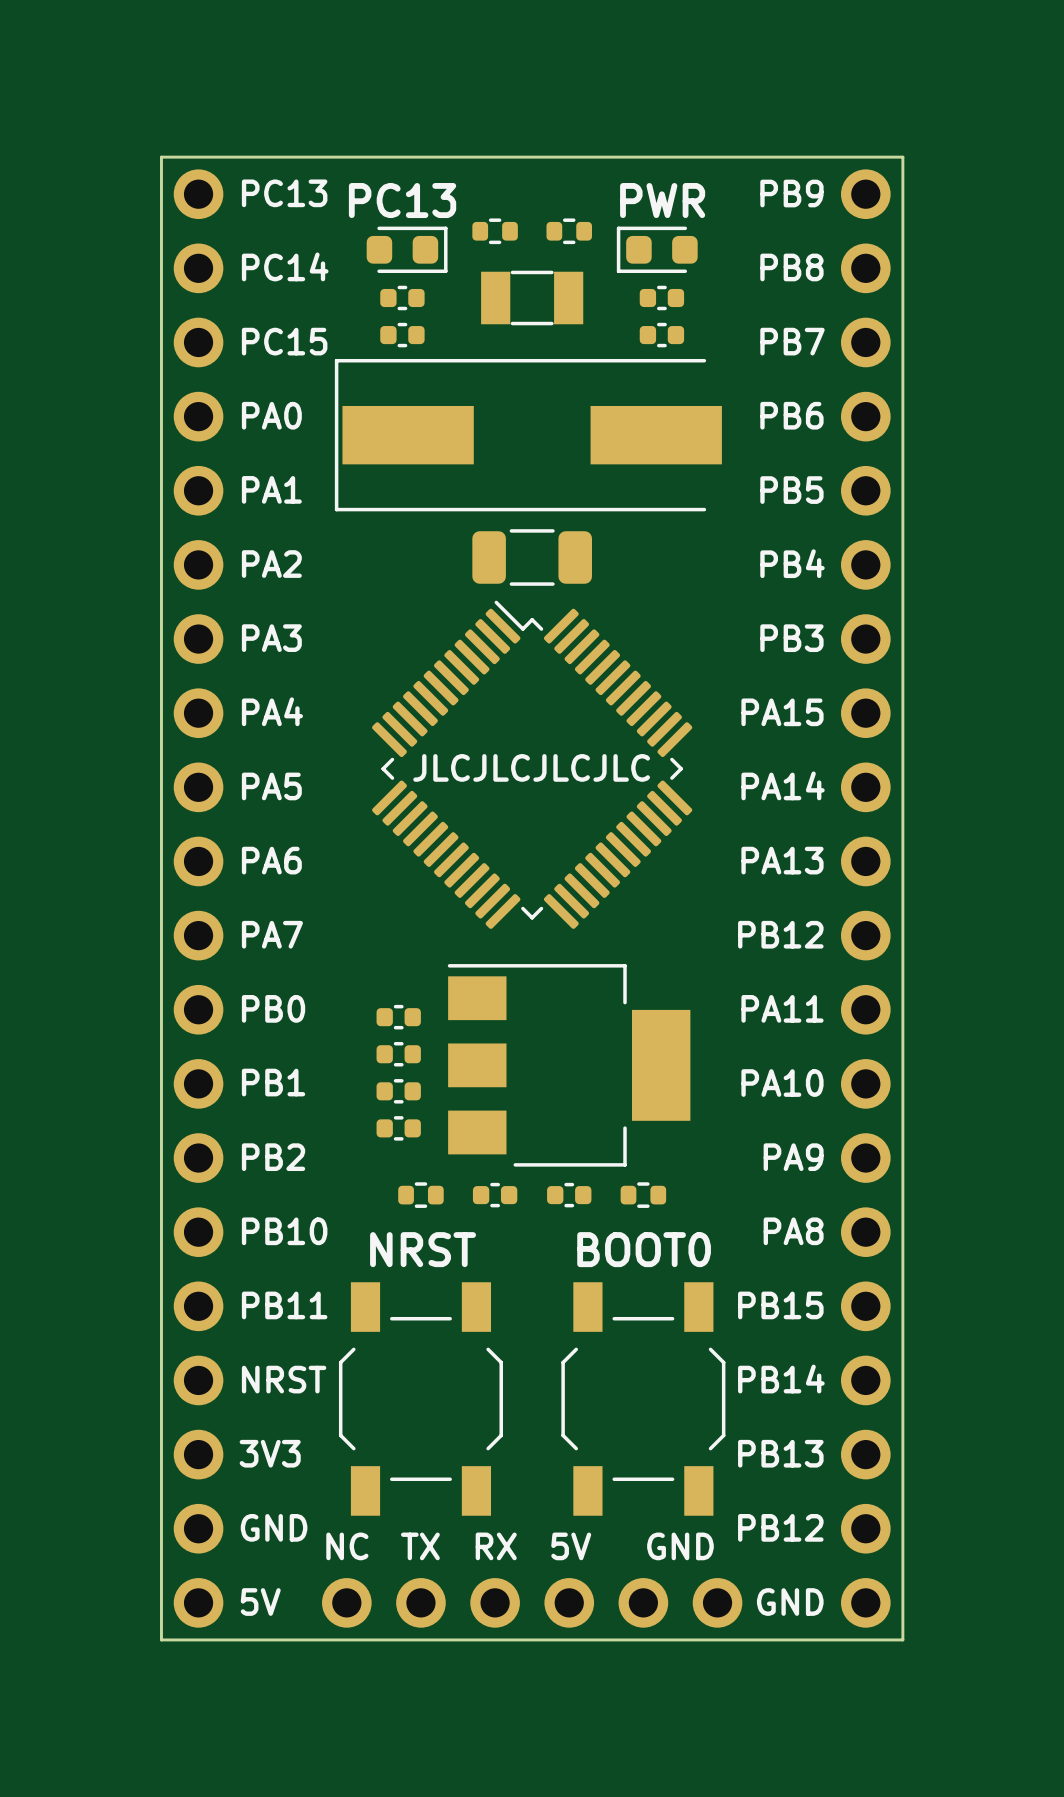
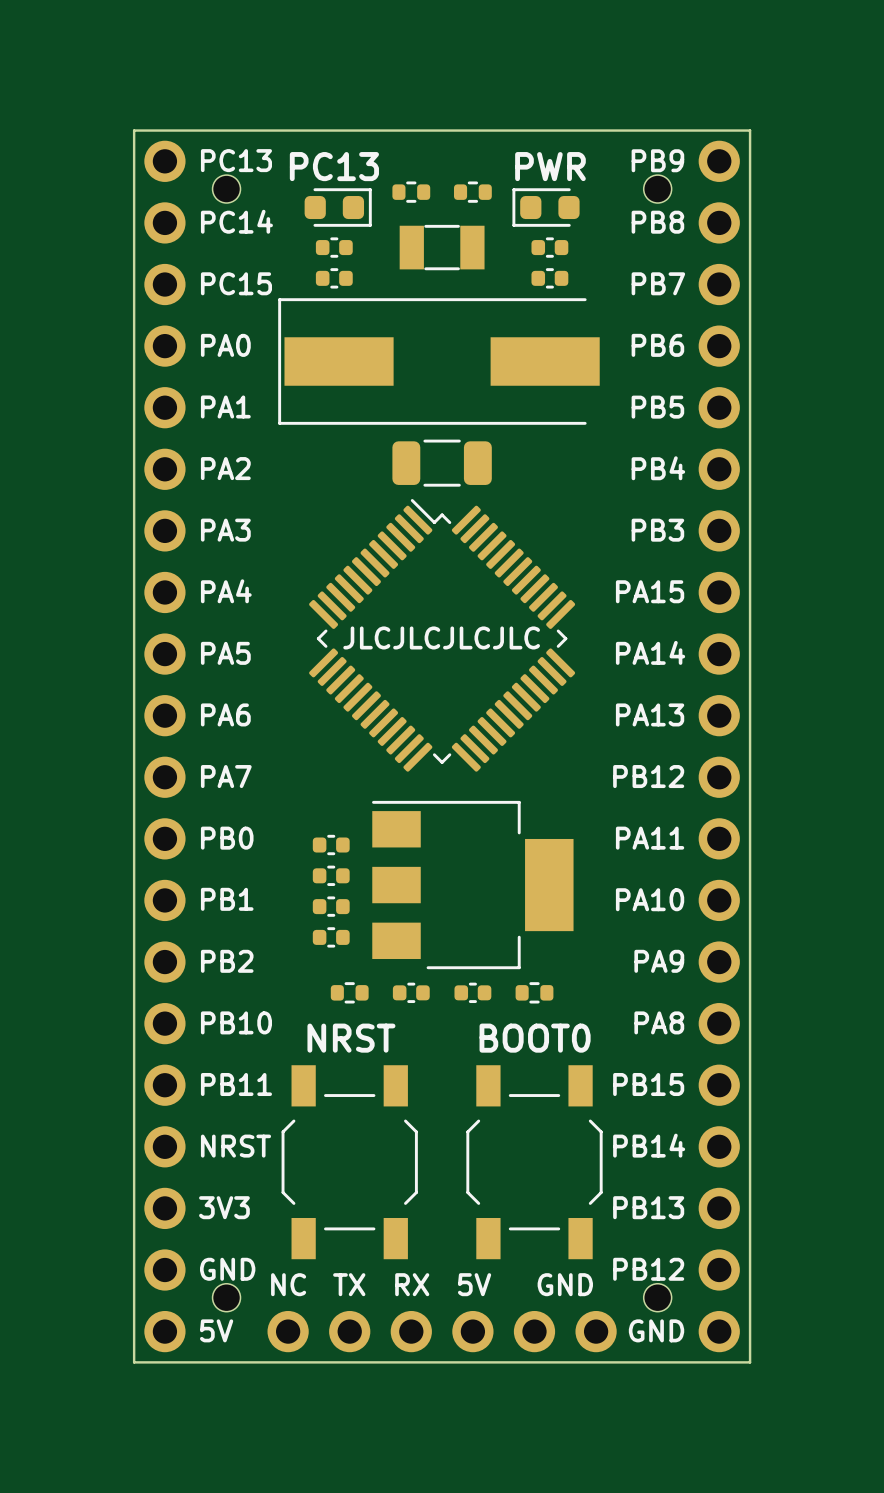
part: none -> (226, 189)
part: none -> (657, 189)
part: none -> (226, 1297)
part: none -> (657, 1297)

